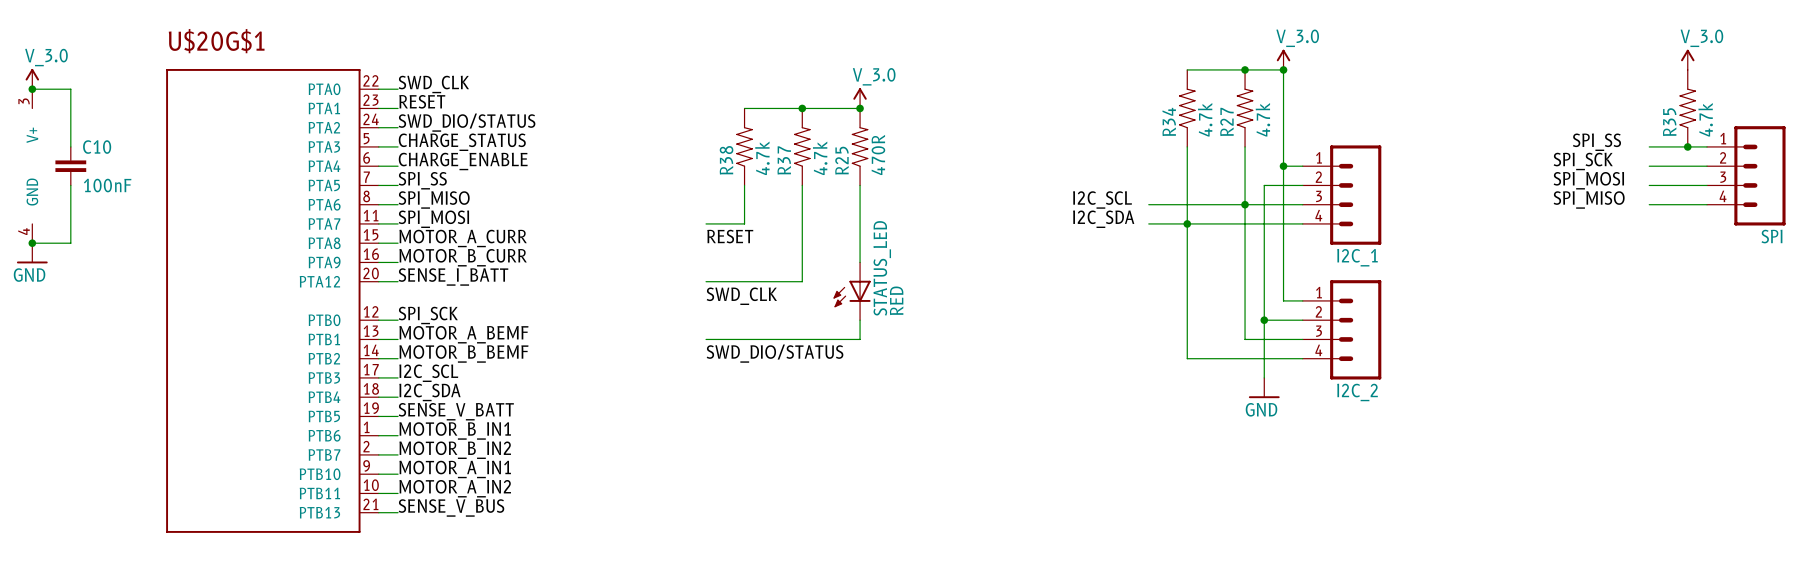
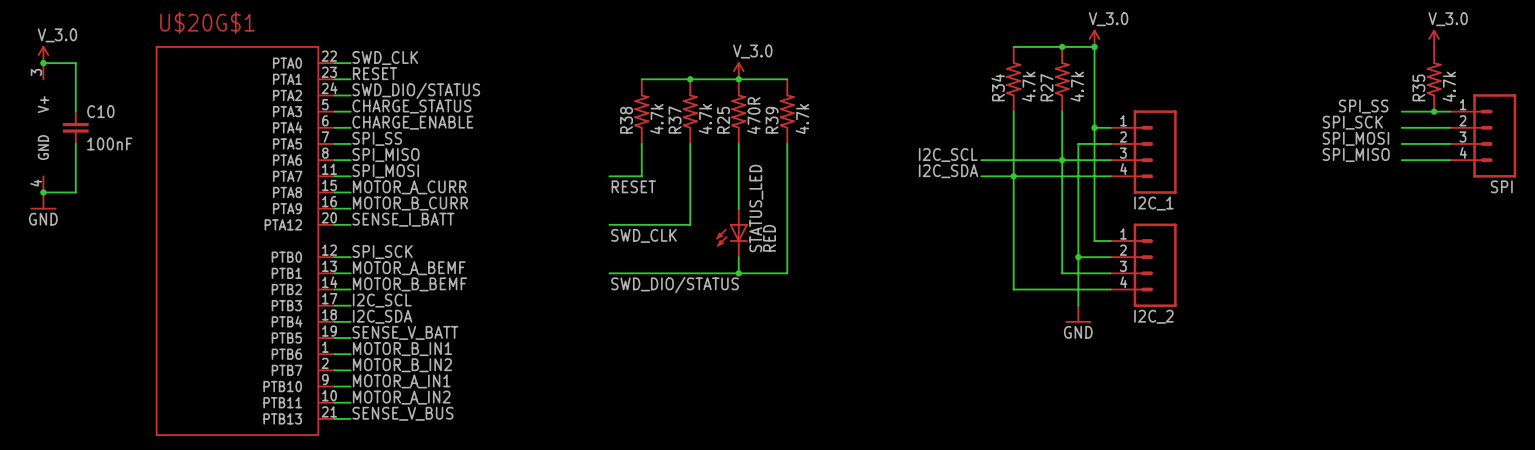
wire: none -> (738, 79) (787, 79)
R39: none -> 4.7k (787, 111)
wire: none -> (787, 143) (787, 273) (738, 273)
junction: none -> (738, 273)

